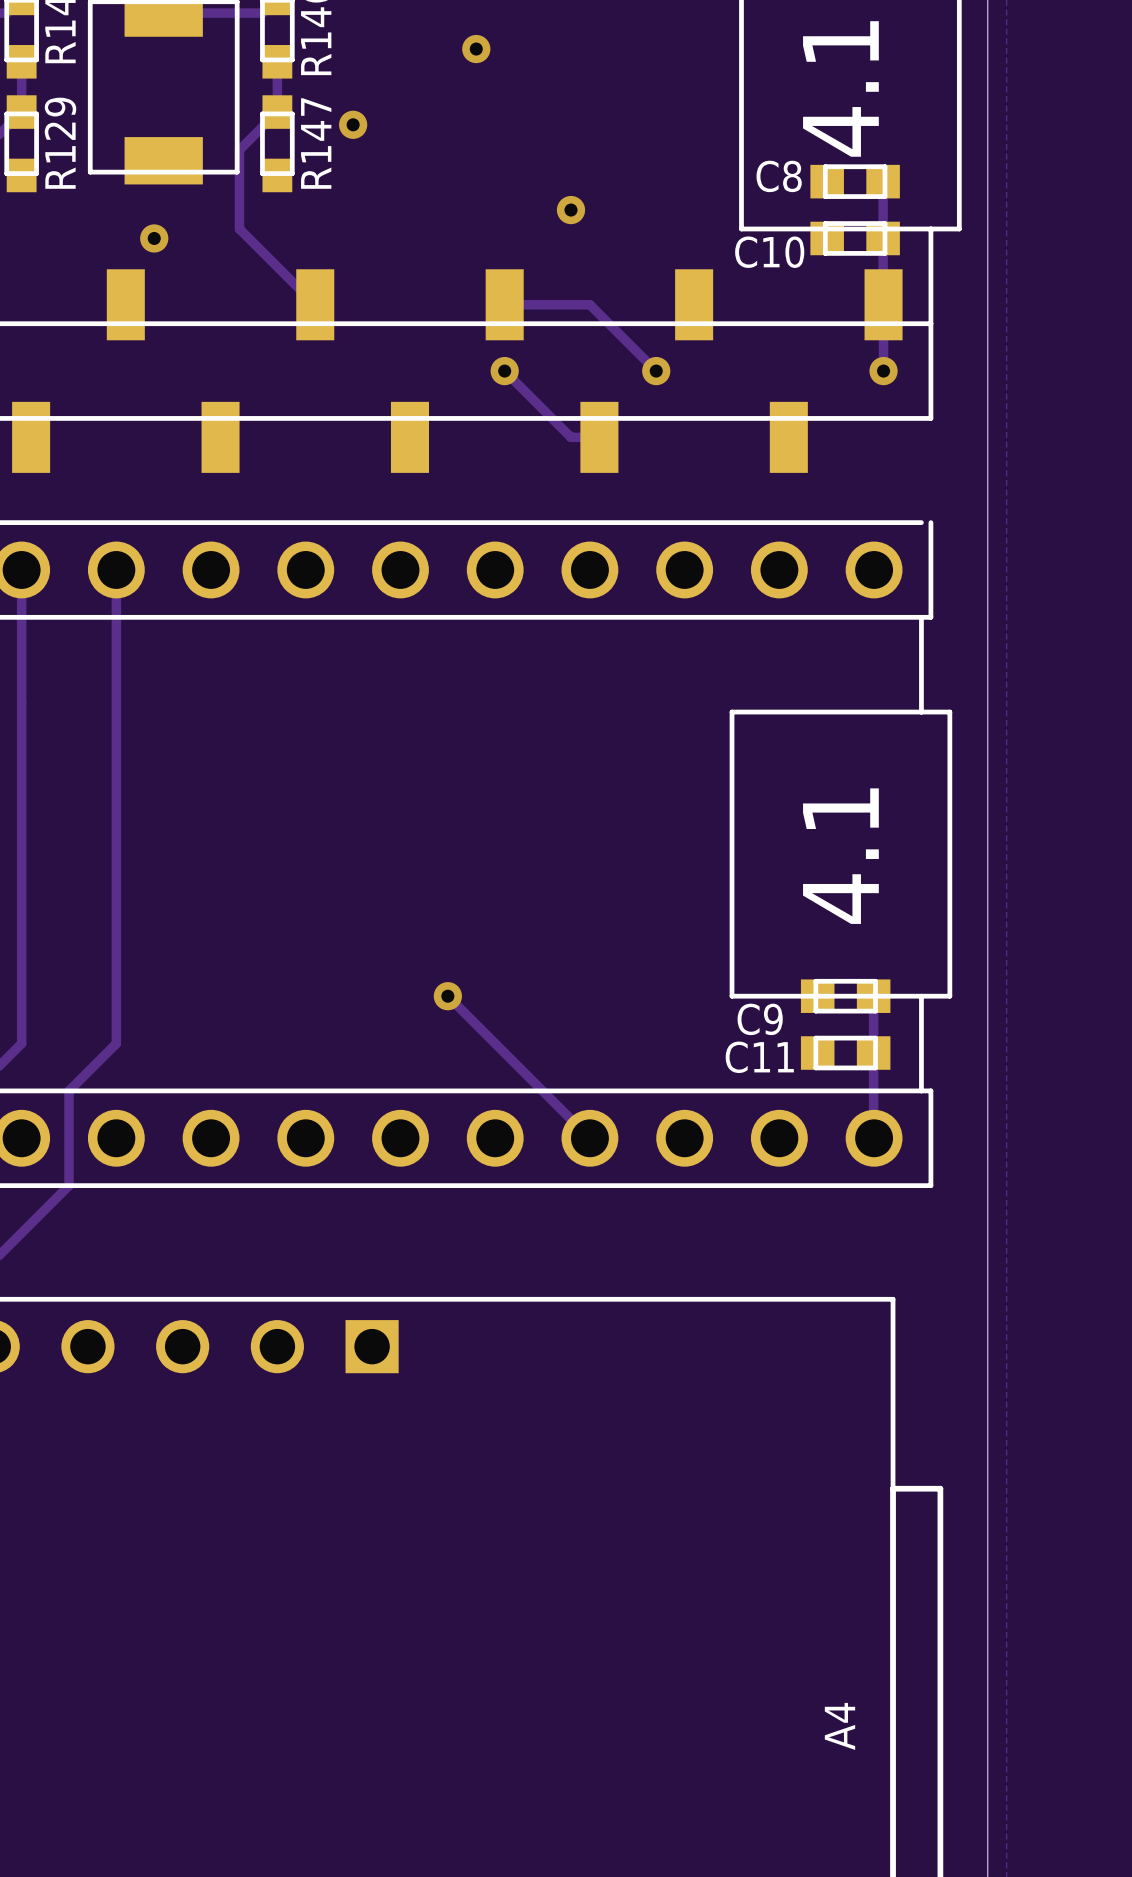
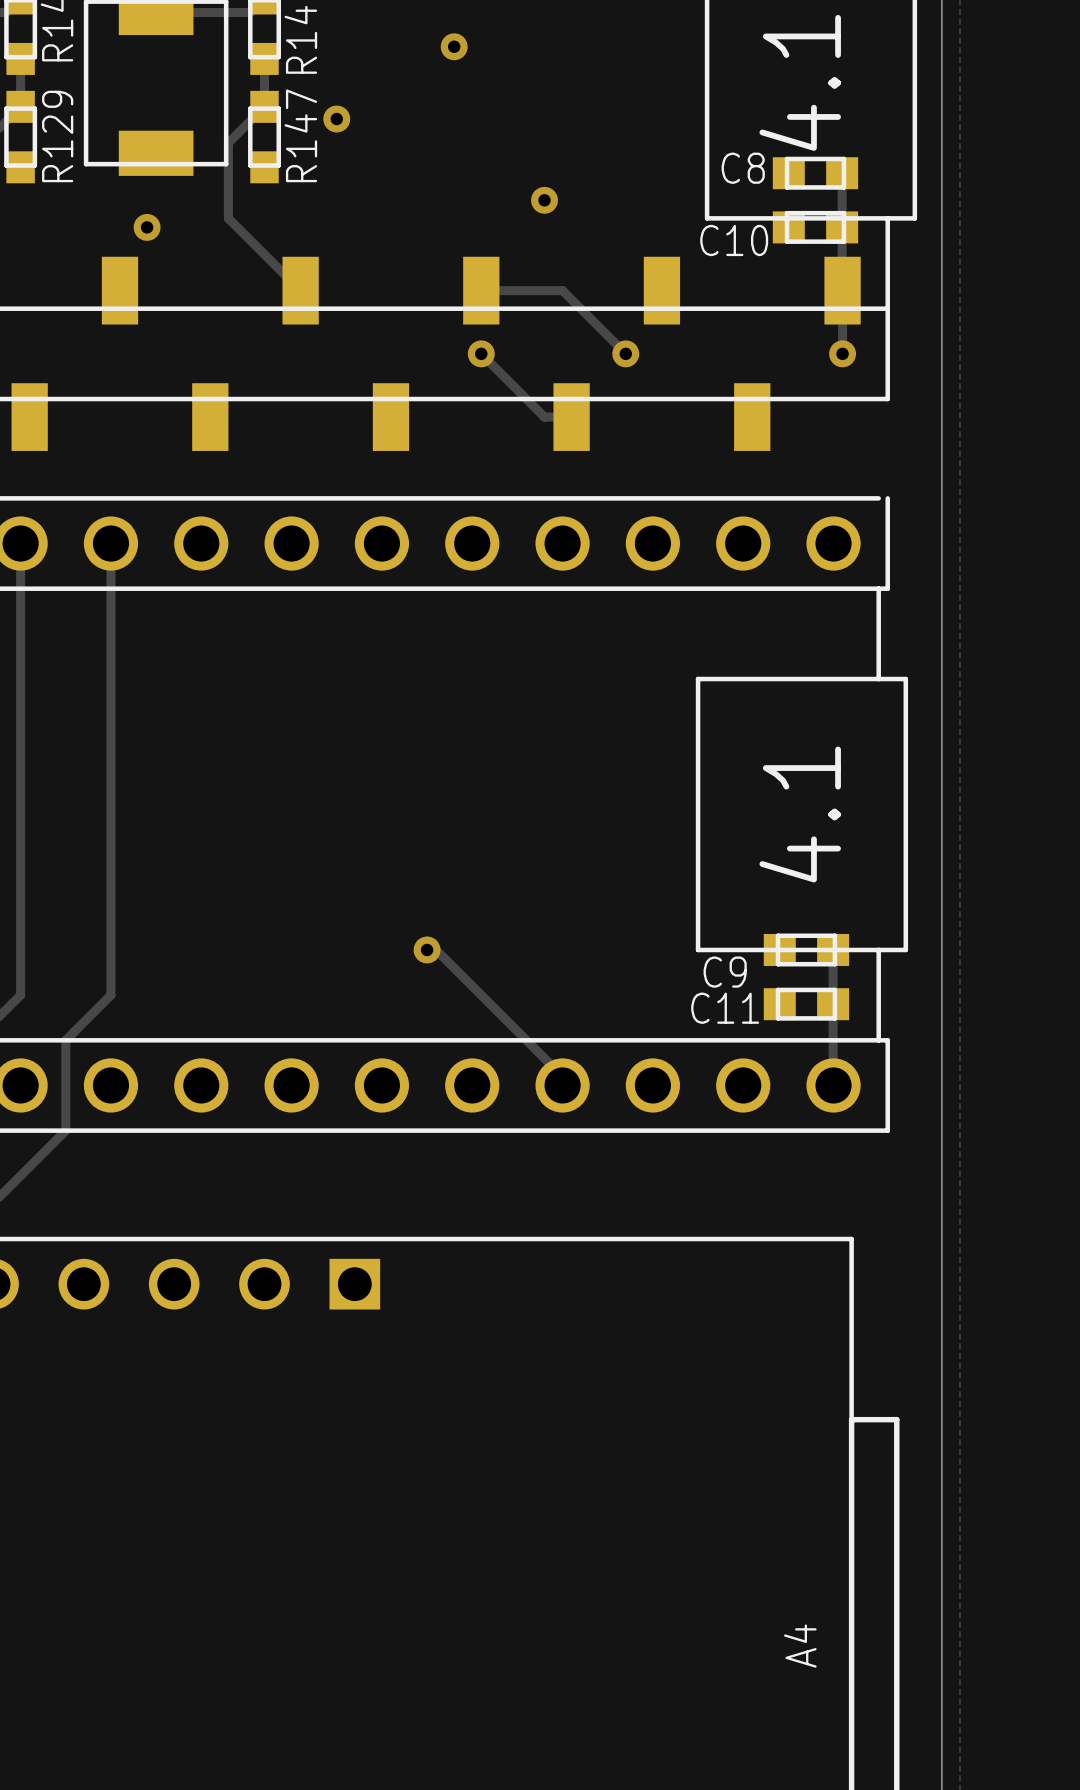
track: none -> (427, 940) (571, 1085)
track: (447, 996) (589, 1138) -> none

